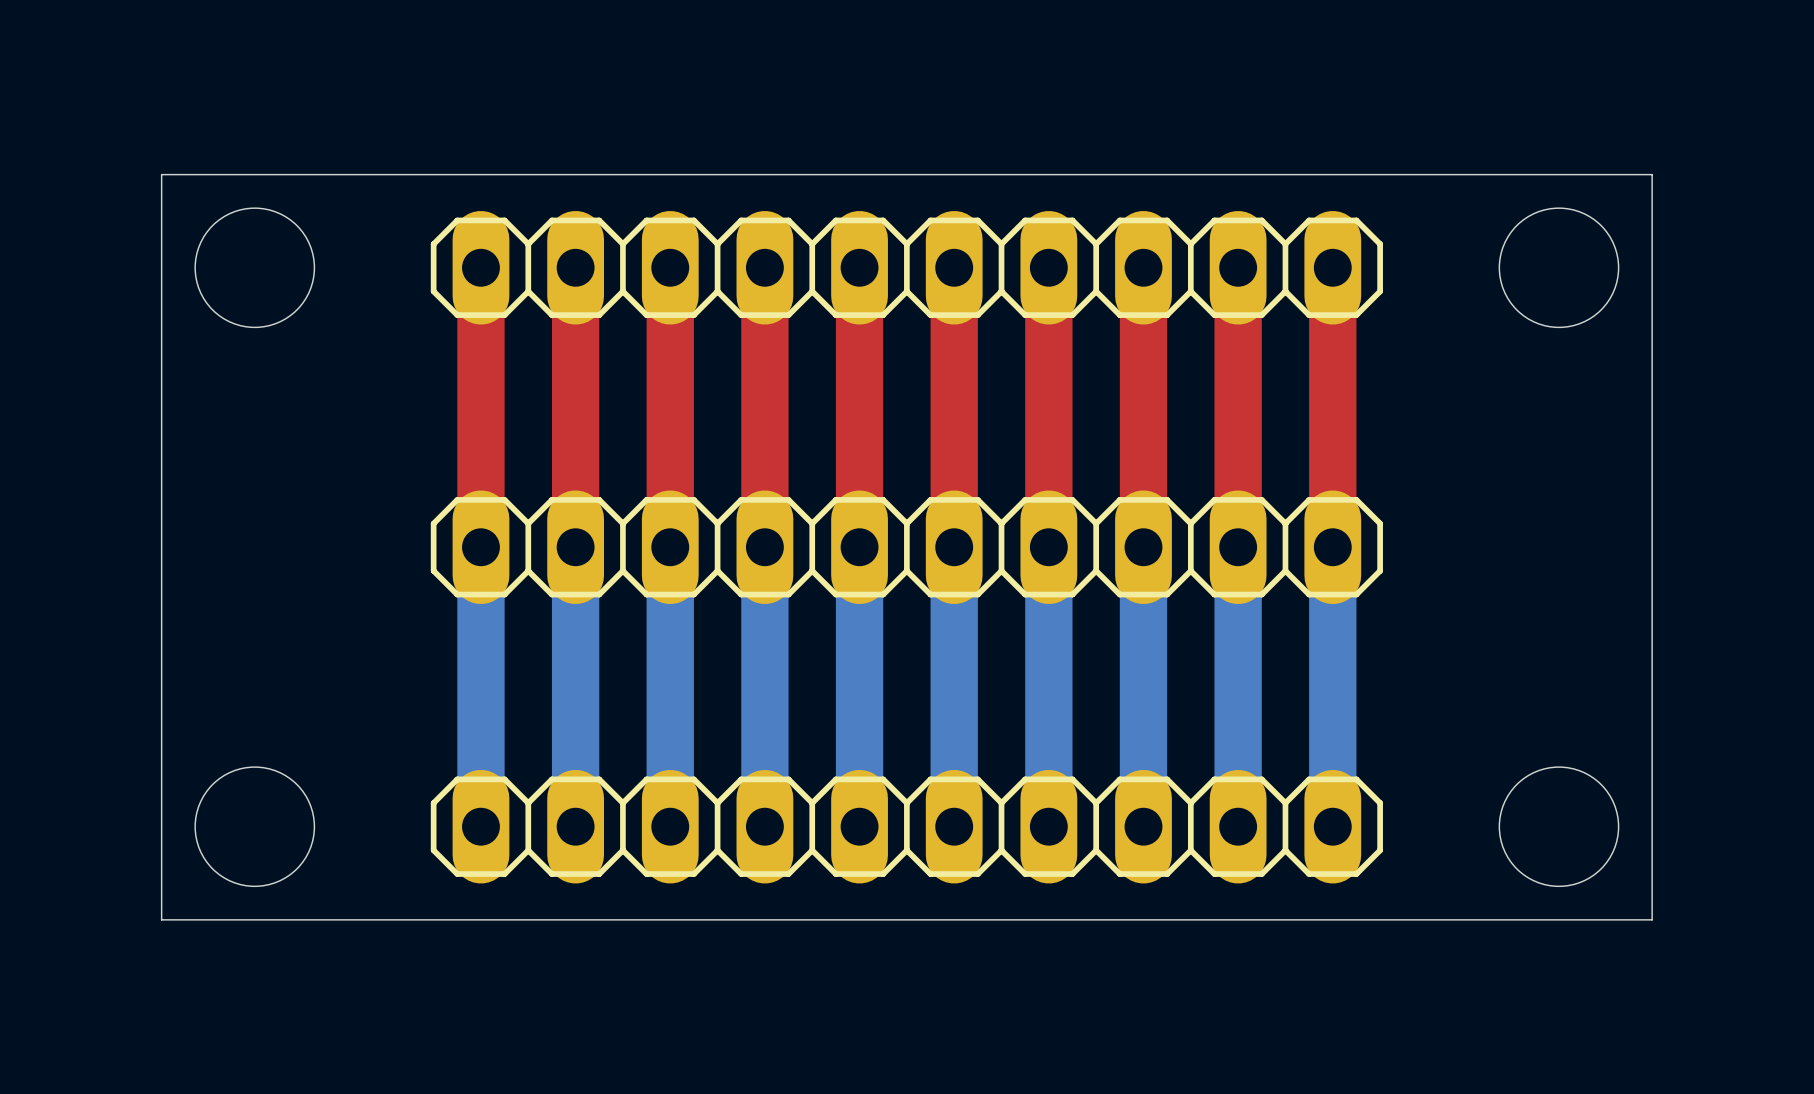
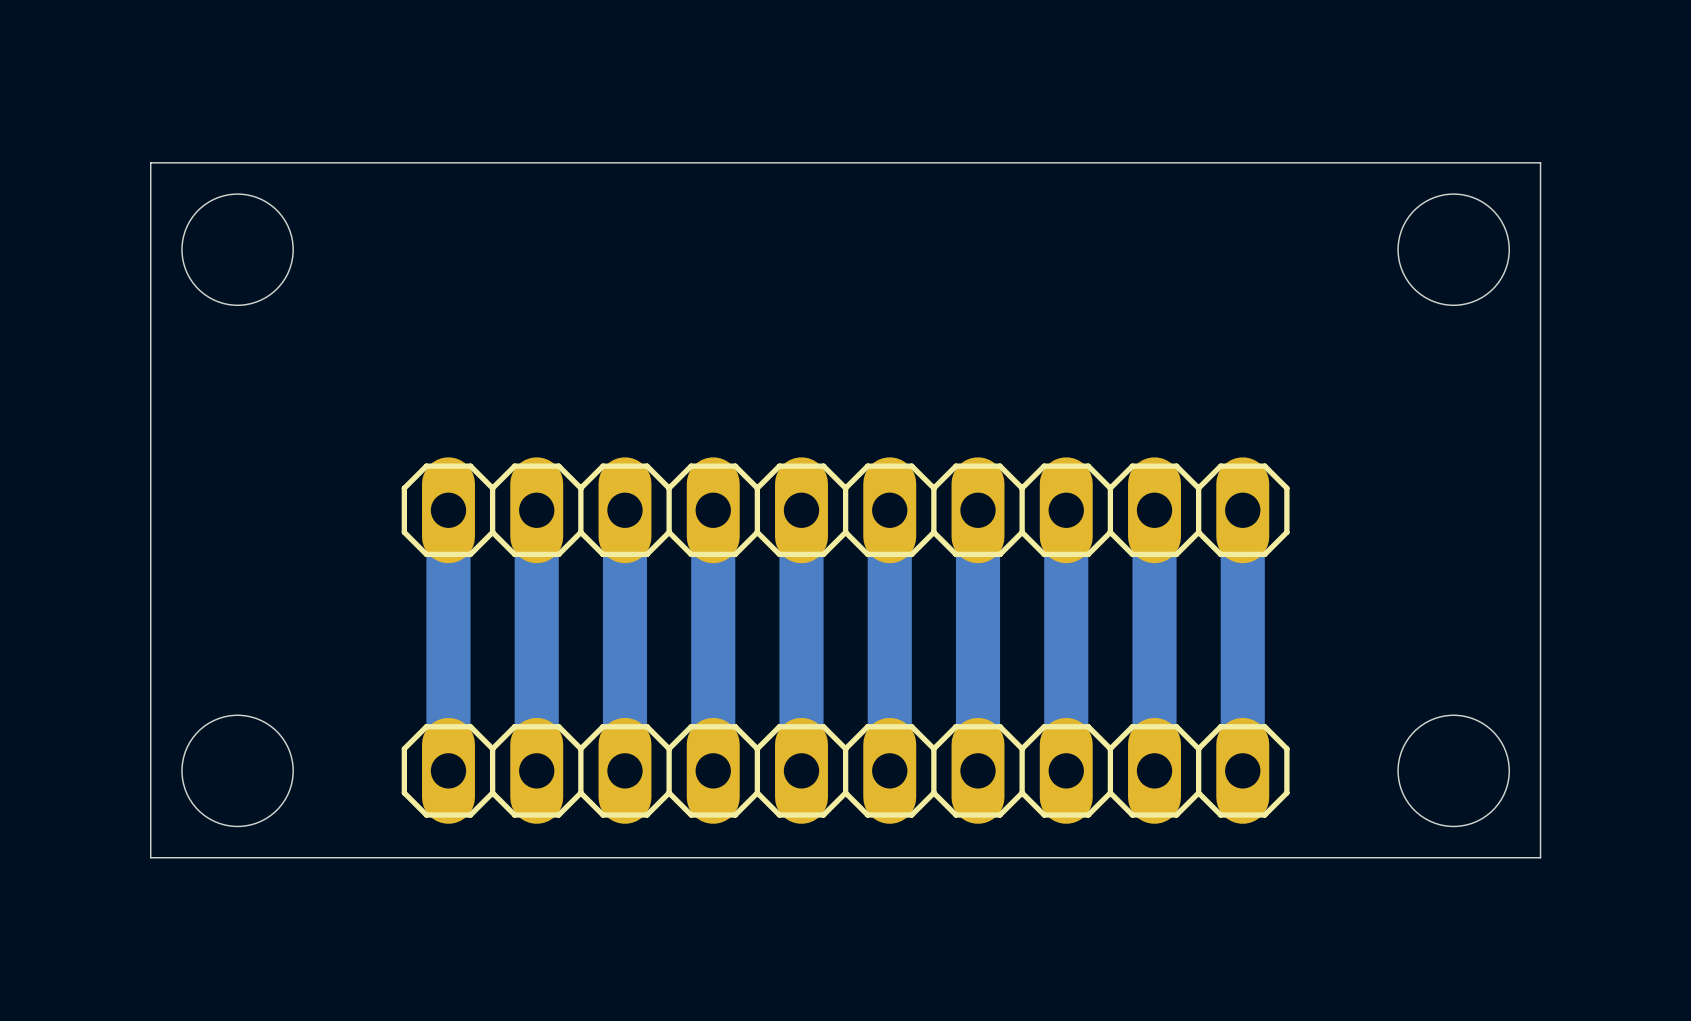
top track: (480, 267) (480, 547) -> none
top track: (575, 267) (575, 547) -> none
top track: (670, 267) (670, 547) -> none
top track: (764, 267) (764, 547) -> none
top track: (859, 267) (859, 547) -> none
part: (906, 267) -> none
top track: (954, 267) (954, 547) -> none
top track: (1048, 267) (1048, 547) -> none
top track: (1143, 267) (1143, 547) -> none
top track: (1238, 267) (1238, 547) -> none
top track: (1332, 267) (1332, 547) -> none

